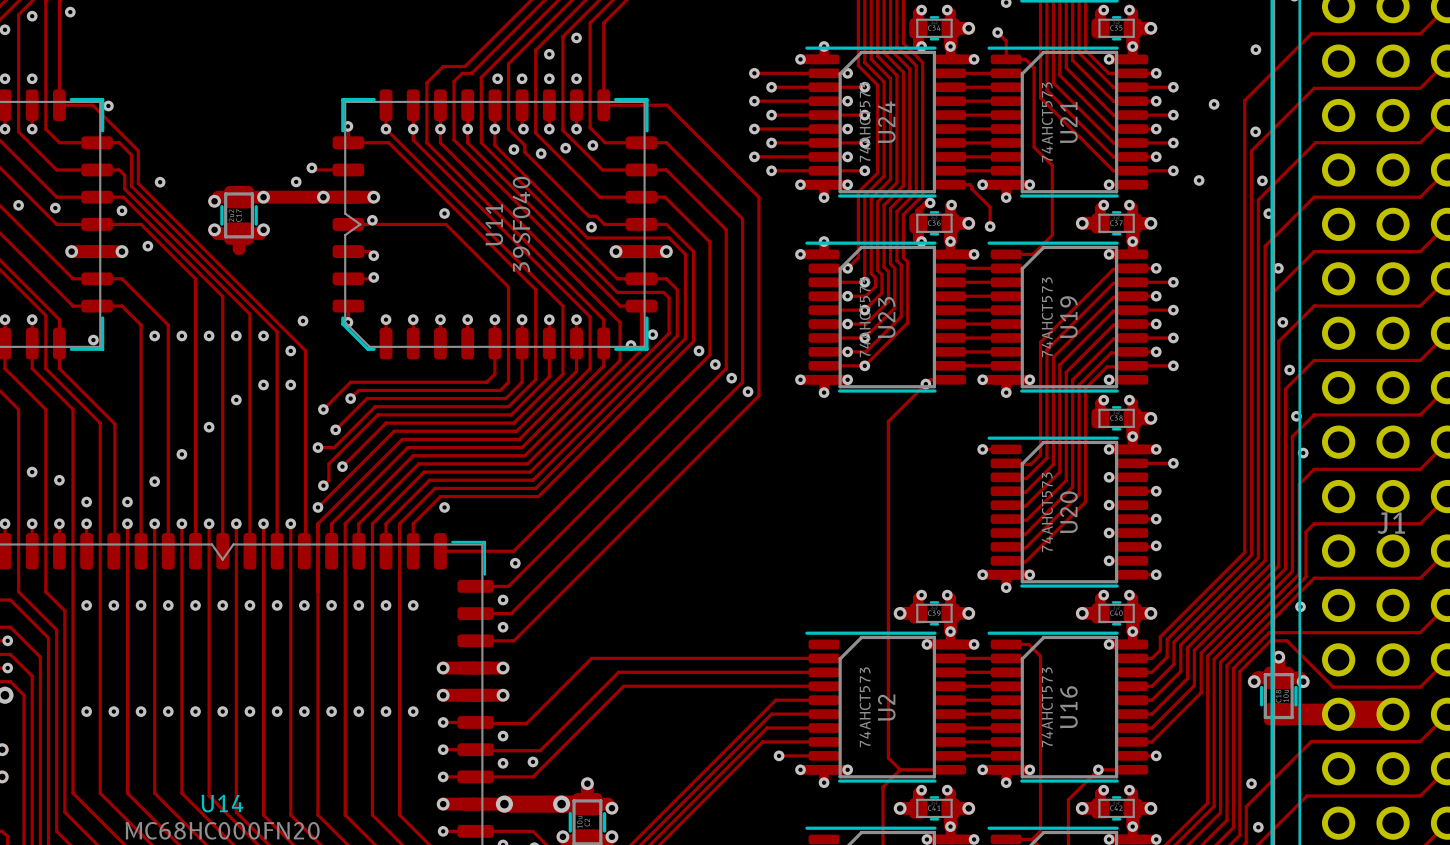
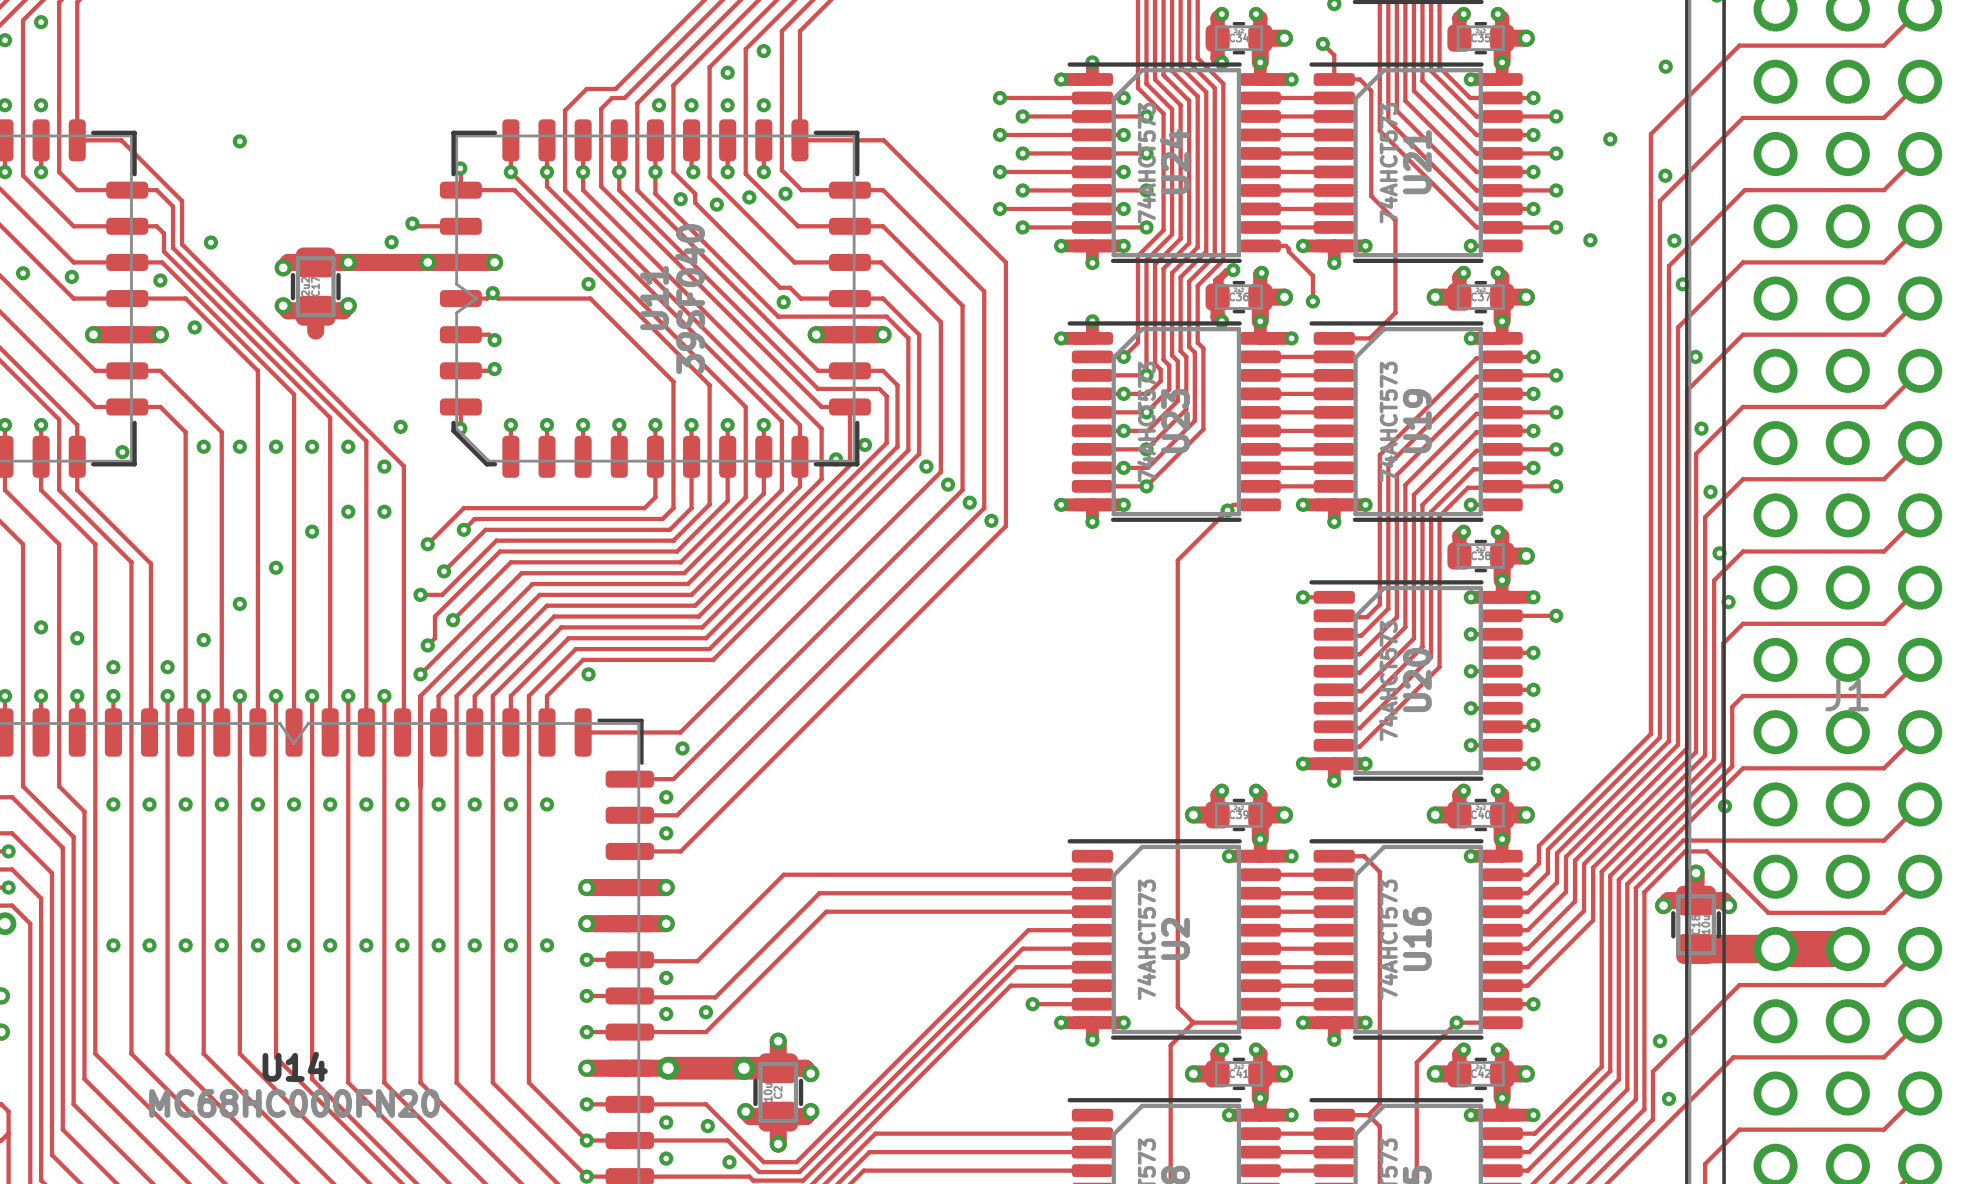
via: (70, 12) -> none
via: (108, 106) -> none
via: none -> (239, 141)

